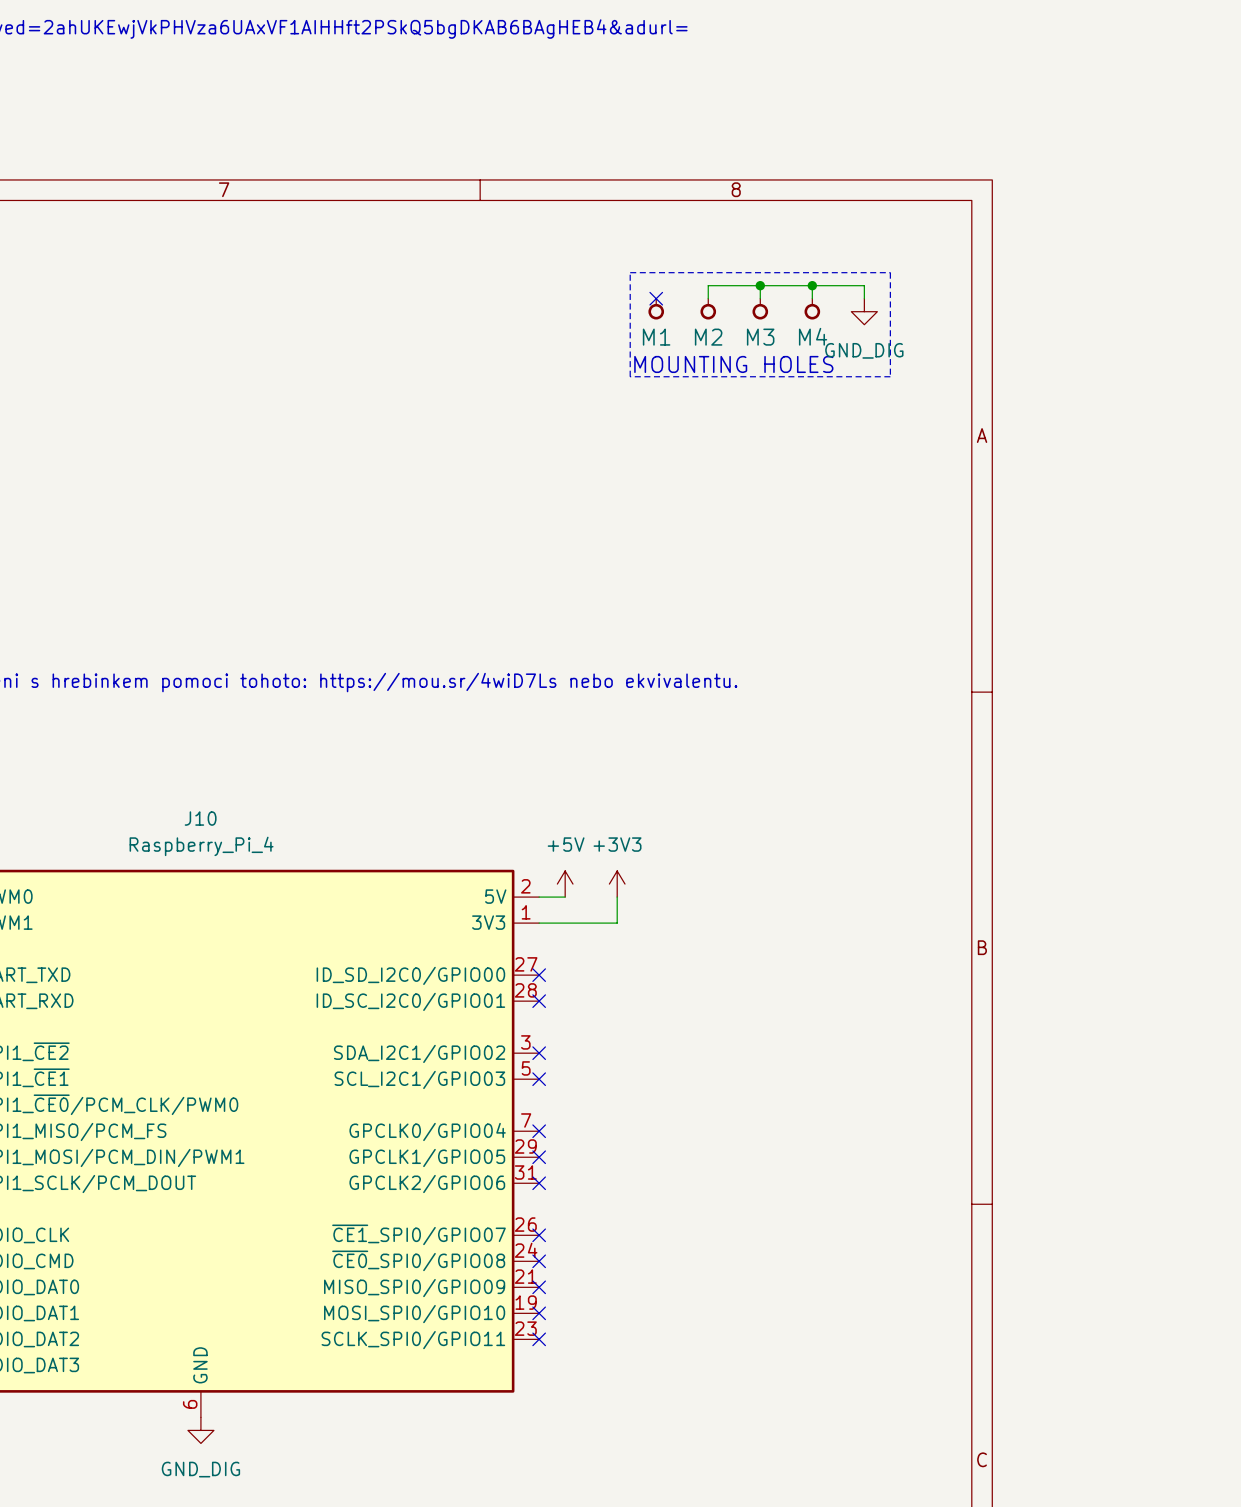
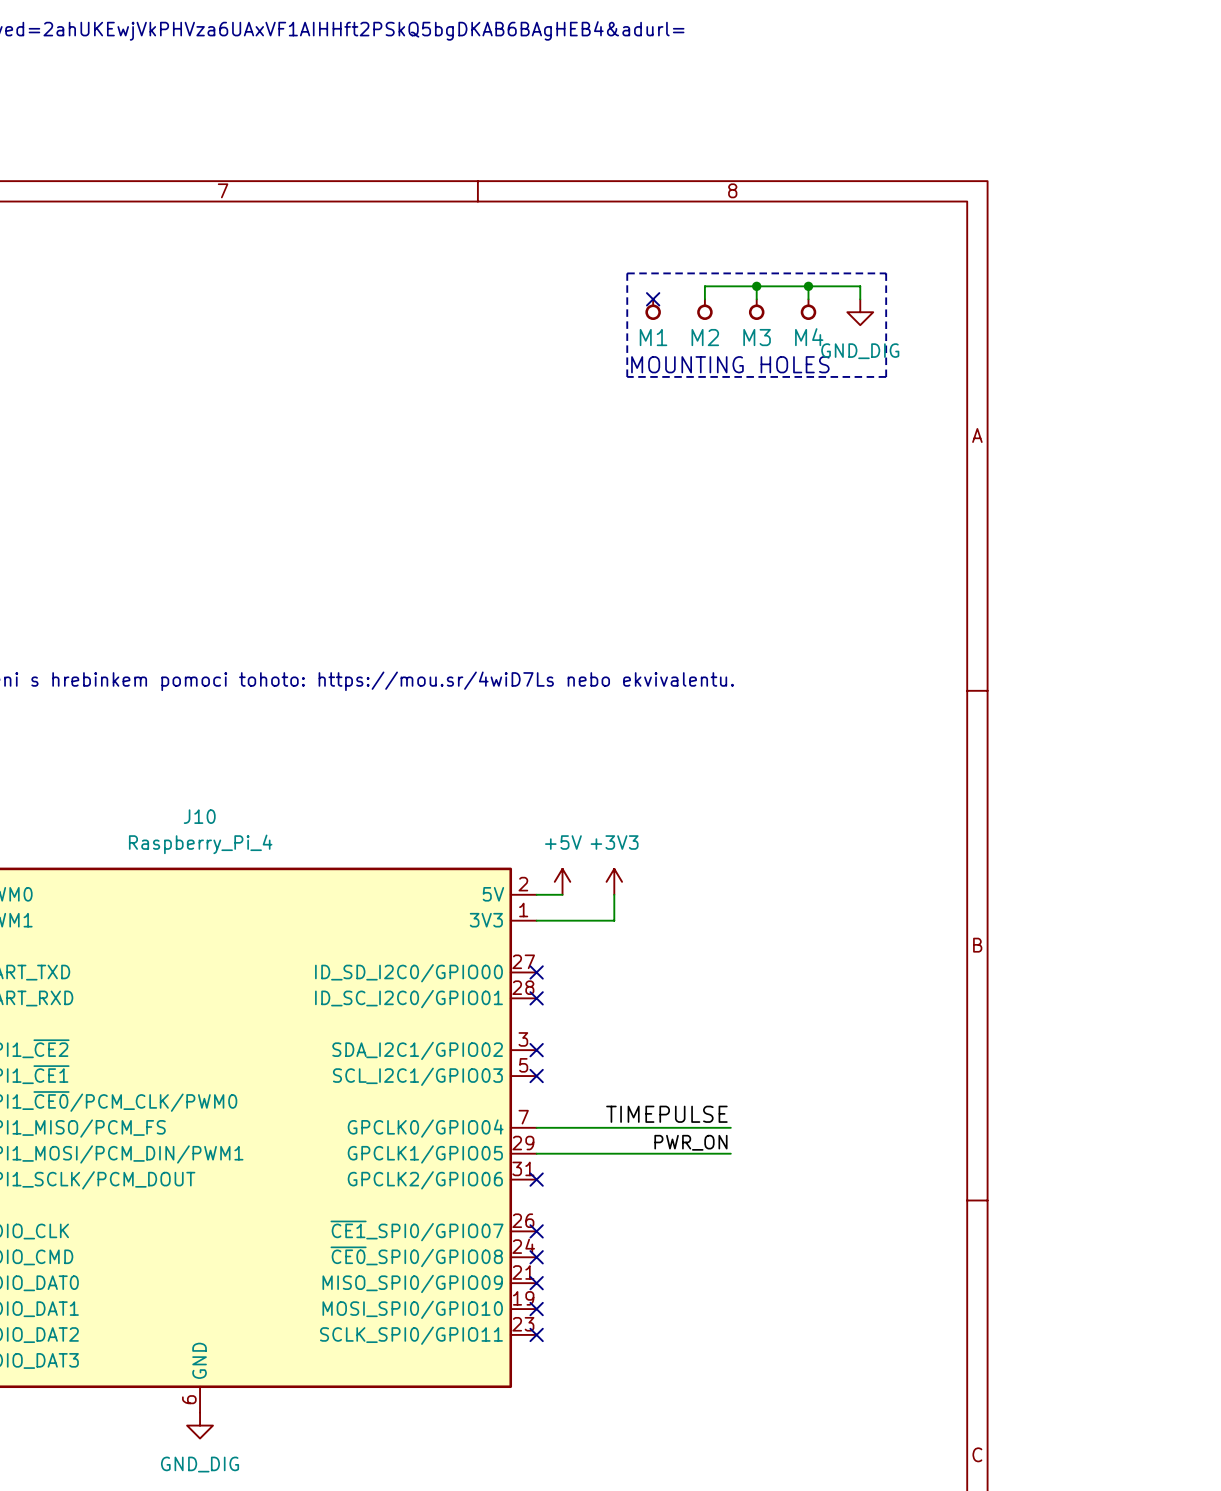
label: none -> TIMEPULSE (666, 1114)
wire: none -> (536, 1127) (730, 1127)
no-connect mark: (539, 1131) -> none
label: none -> PWR_ON (690, 1142)
wire: none -> (536, 1153) (730, 1153)
no-connect mark: (539, 1157) -> none

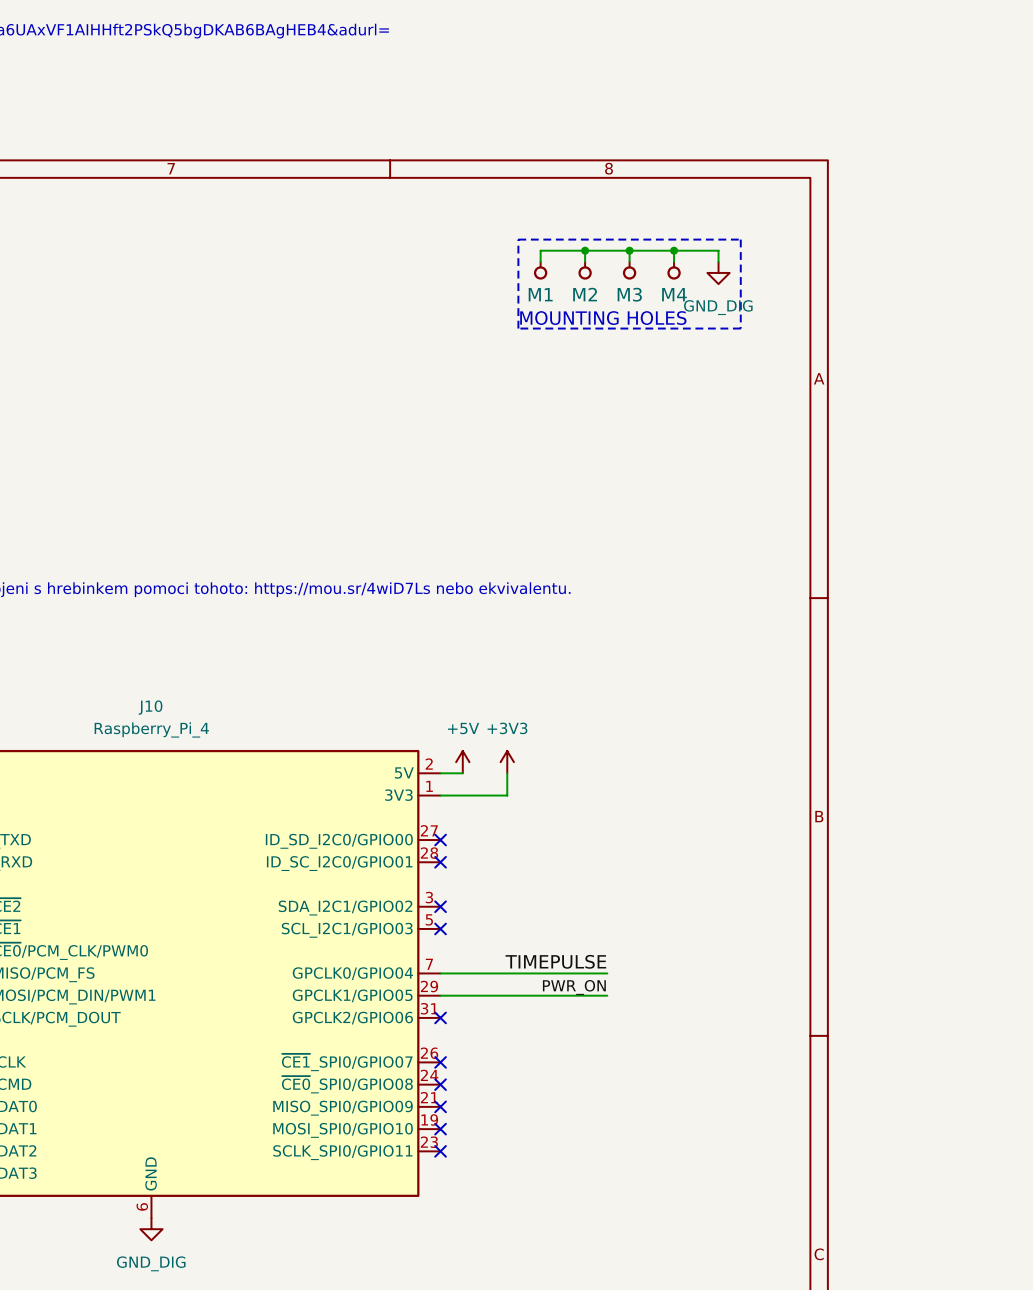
wire: none -> (585, 250) (540, 250) (540, 261)
junction: none -> (585, 250)
no-connect mark: (653, 299) -> none

